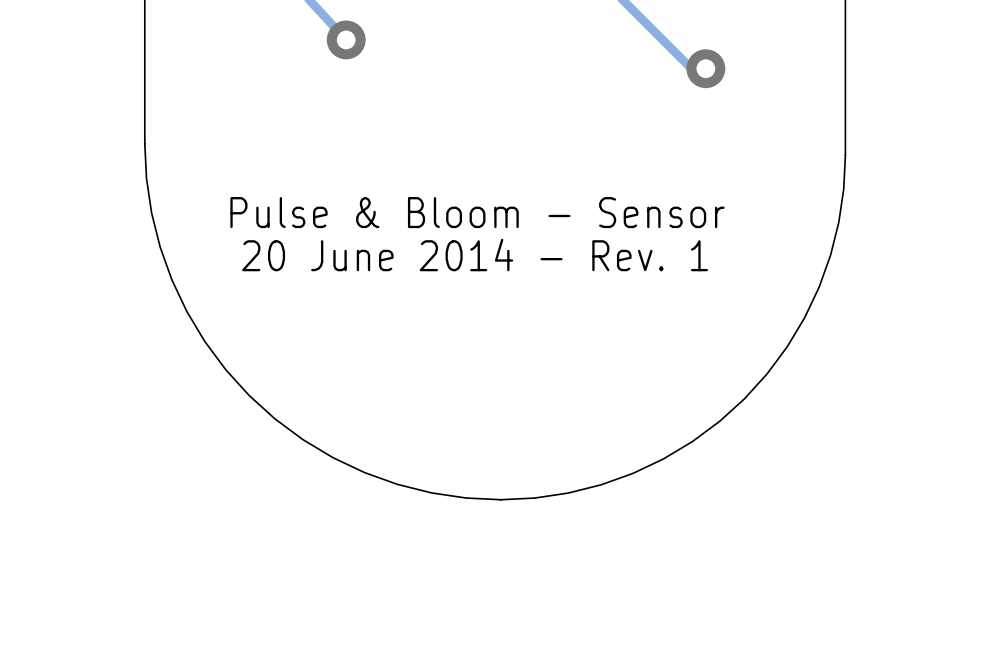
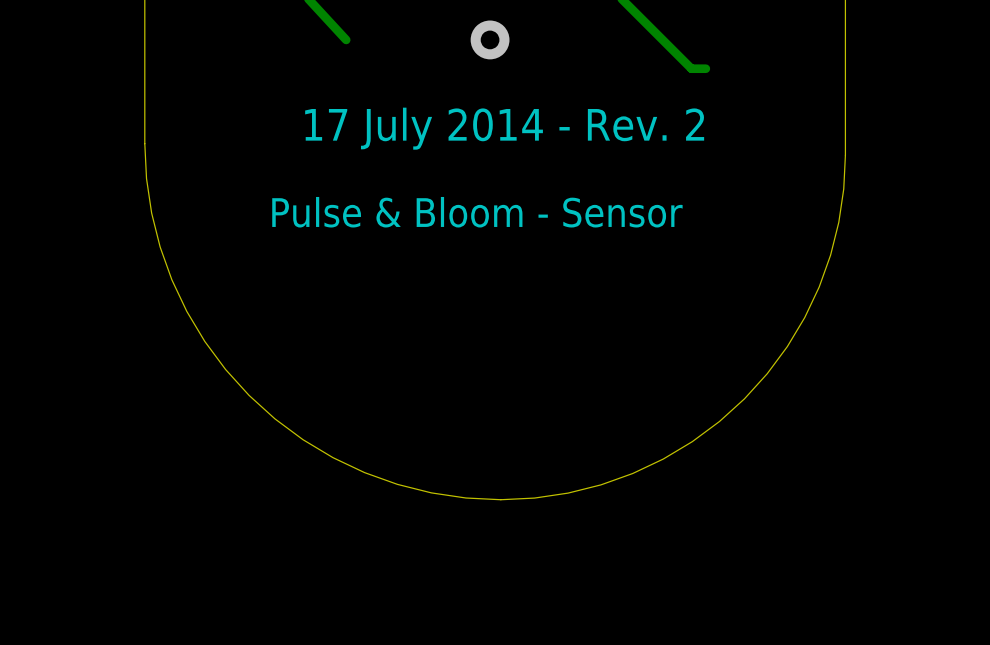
via: (346, 39) -> none
via: none -> (490, 39)
via: (705, 68) -> none
text: none -> 17 July 2014 - Rev. 2 (504, 128)
text: 20 June 2014 - Rev. 1 (475, 255) -> none

